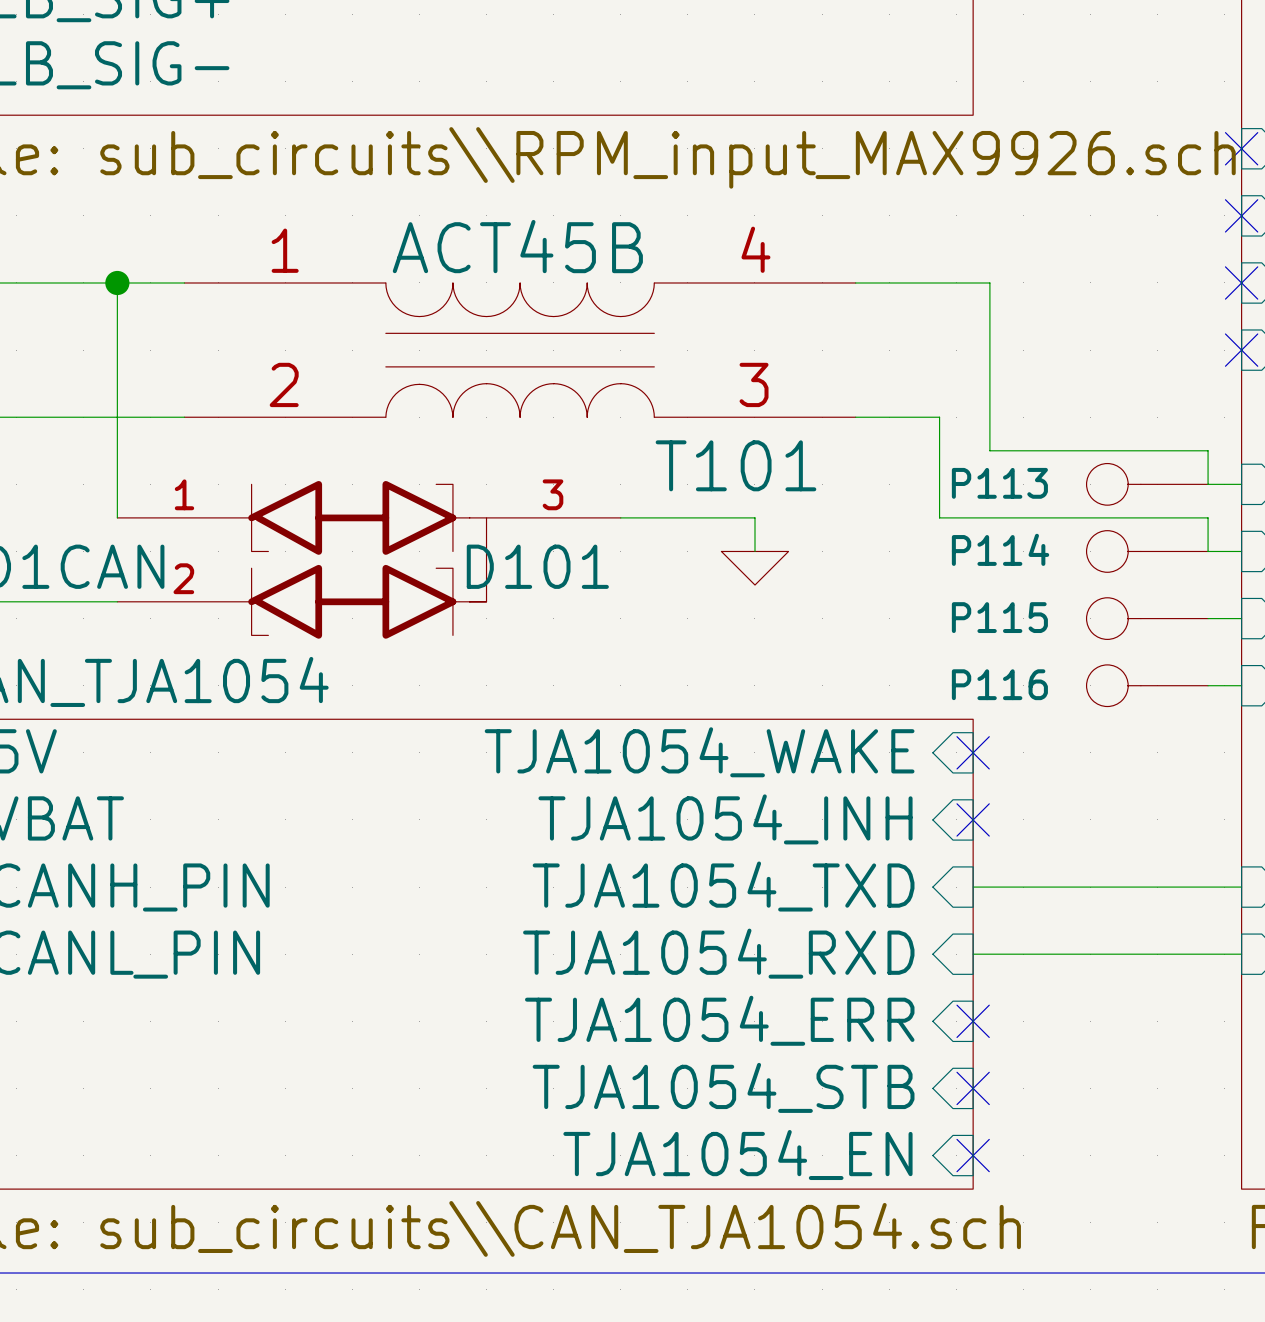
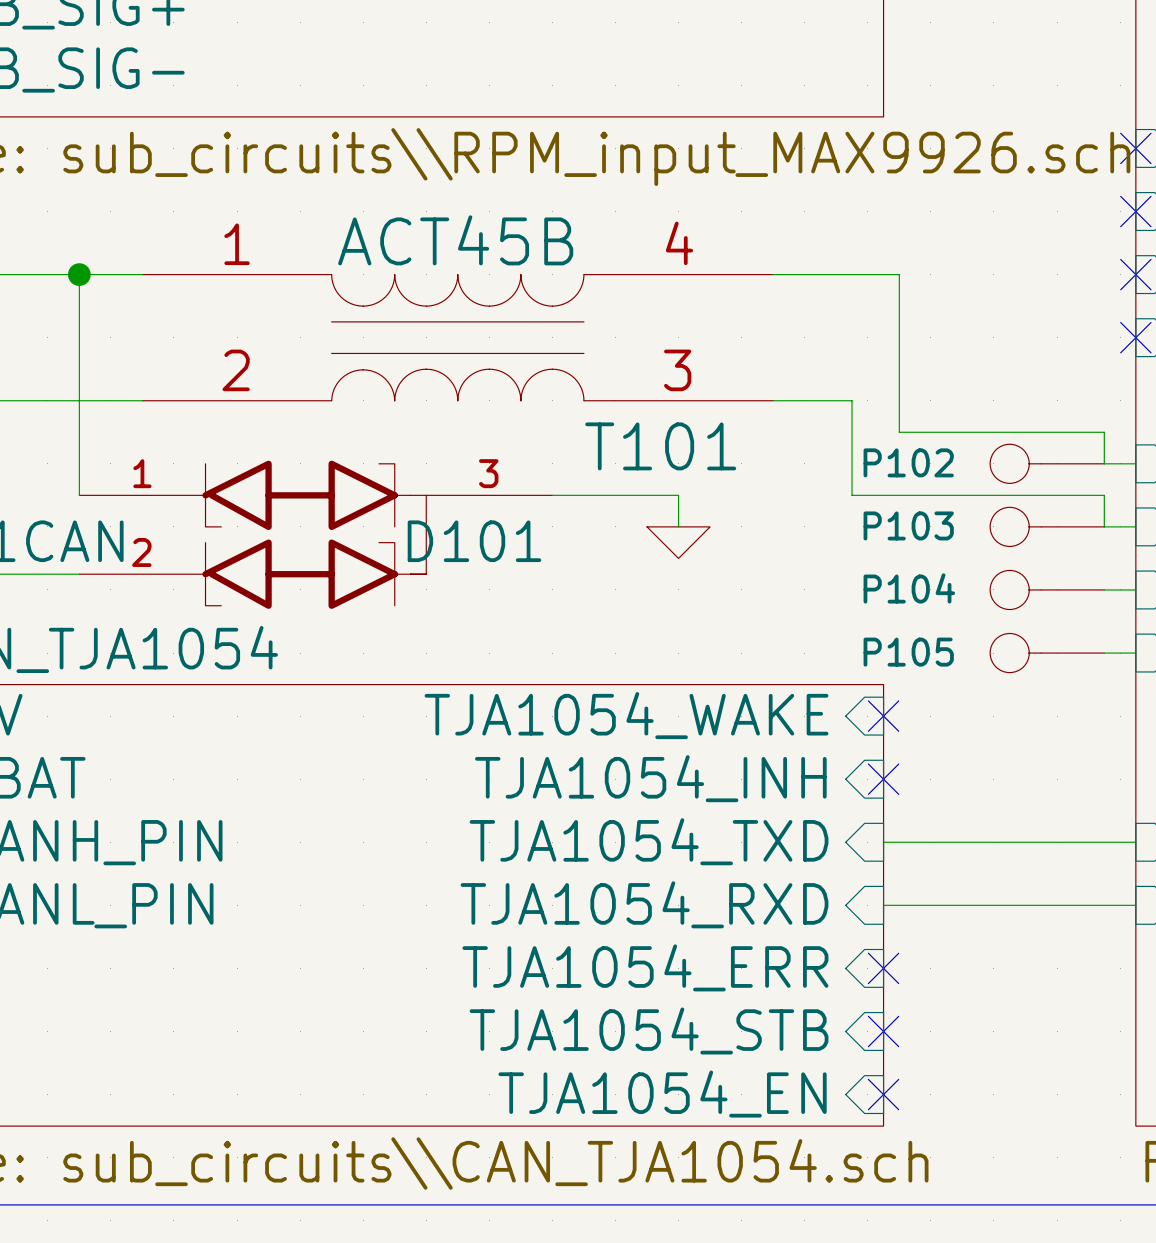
P113 name: P113 (999, 483) -> P102 (908, 462)
P114 name: P114 (1000, 549) -> P103 (908, 525)
P115 name: P115 (999, 617) -> P104 (909, 588)
P116 name: P116 (999, 684) -> P105 (908, 652)

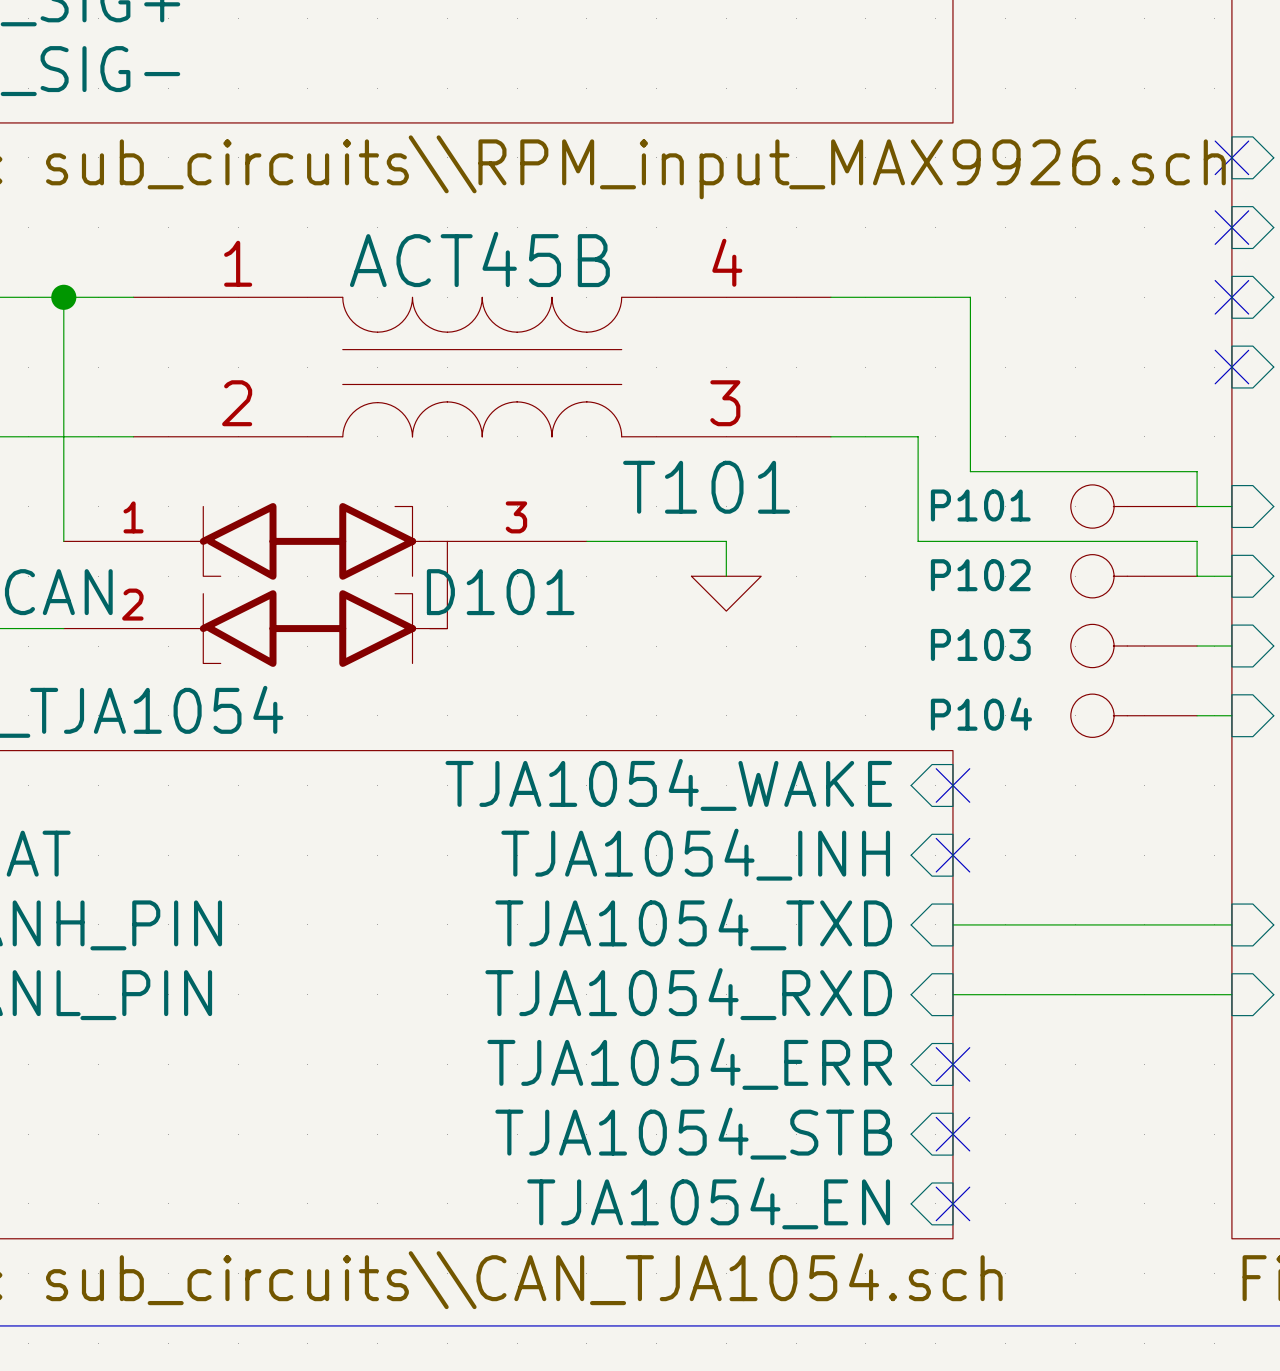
P102 name: P102 (908, 462) -> P101 (980, 505)
P103 name: P103 (908, 525) -> P102 (980, 575)
P104 name: P104 (909, 588) -> P103 (980, 644)
P105 name: P105 (908, 652) -> P104 (981, 714)

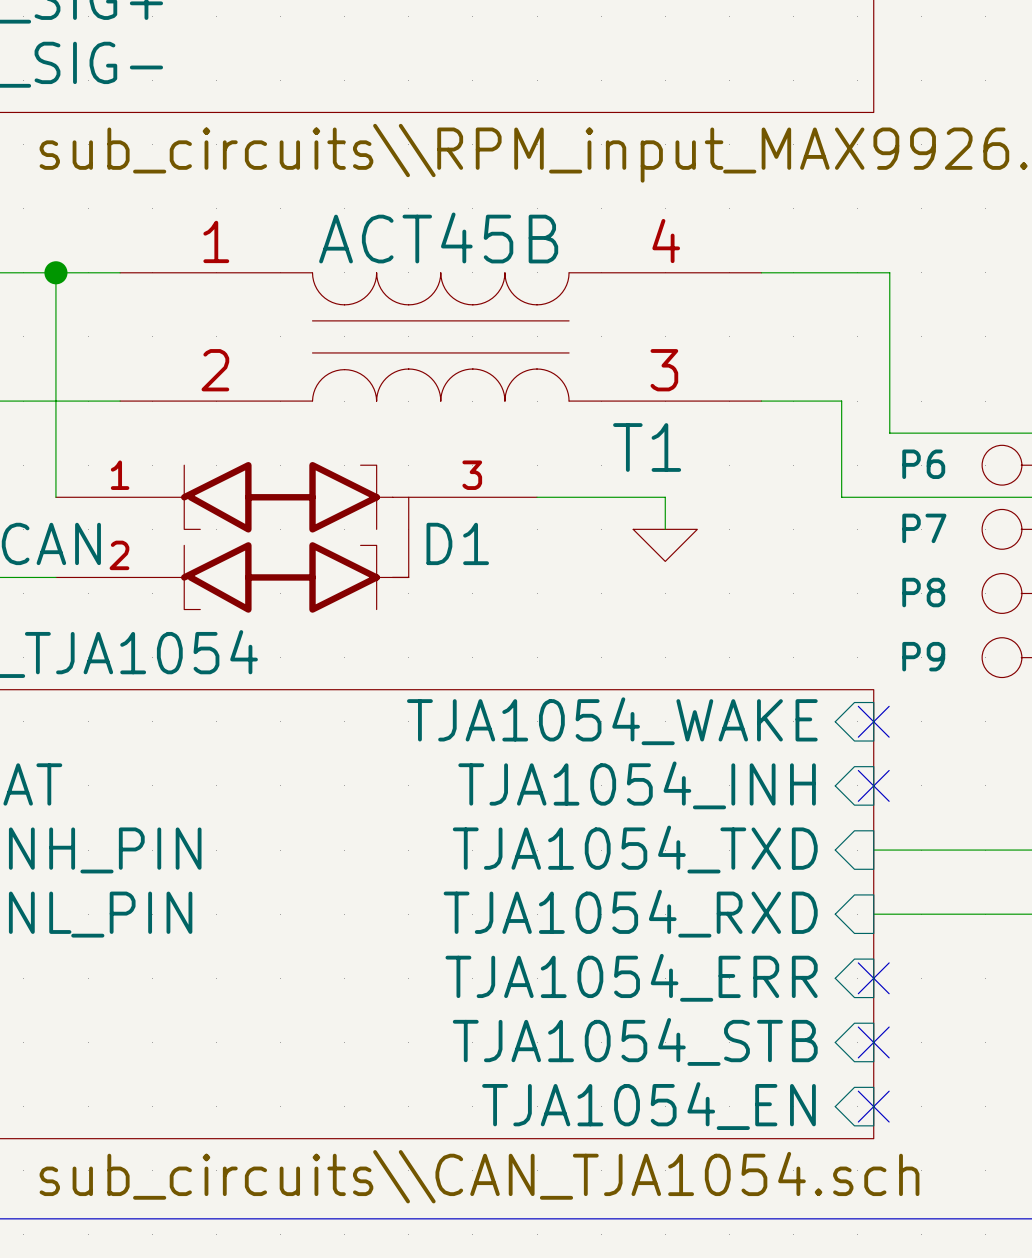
T101 name: T101 (706, 487) -> T1 (647, 447)
P101 name: P101 (980, 505) -> P6 (923, 464)
P102 name: P102 (980, 575) -> P7 (924, 528)
D101 name: D101 (500, 592) -> D1 (457, 543)
P103 name: P103 (980, 644) -> P8 (923, 592)
P104 name: P104 (981, 714) -> P9 (923, 656)

